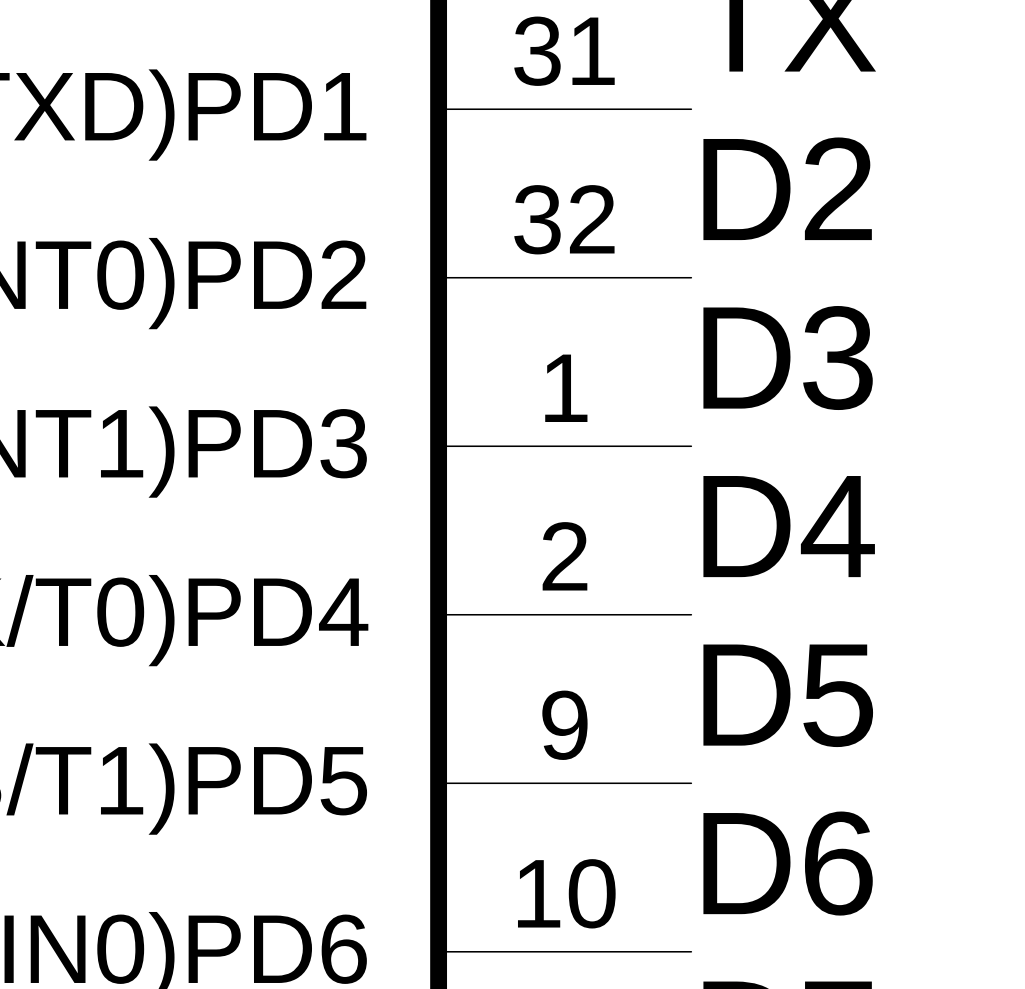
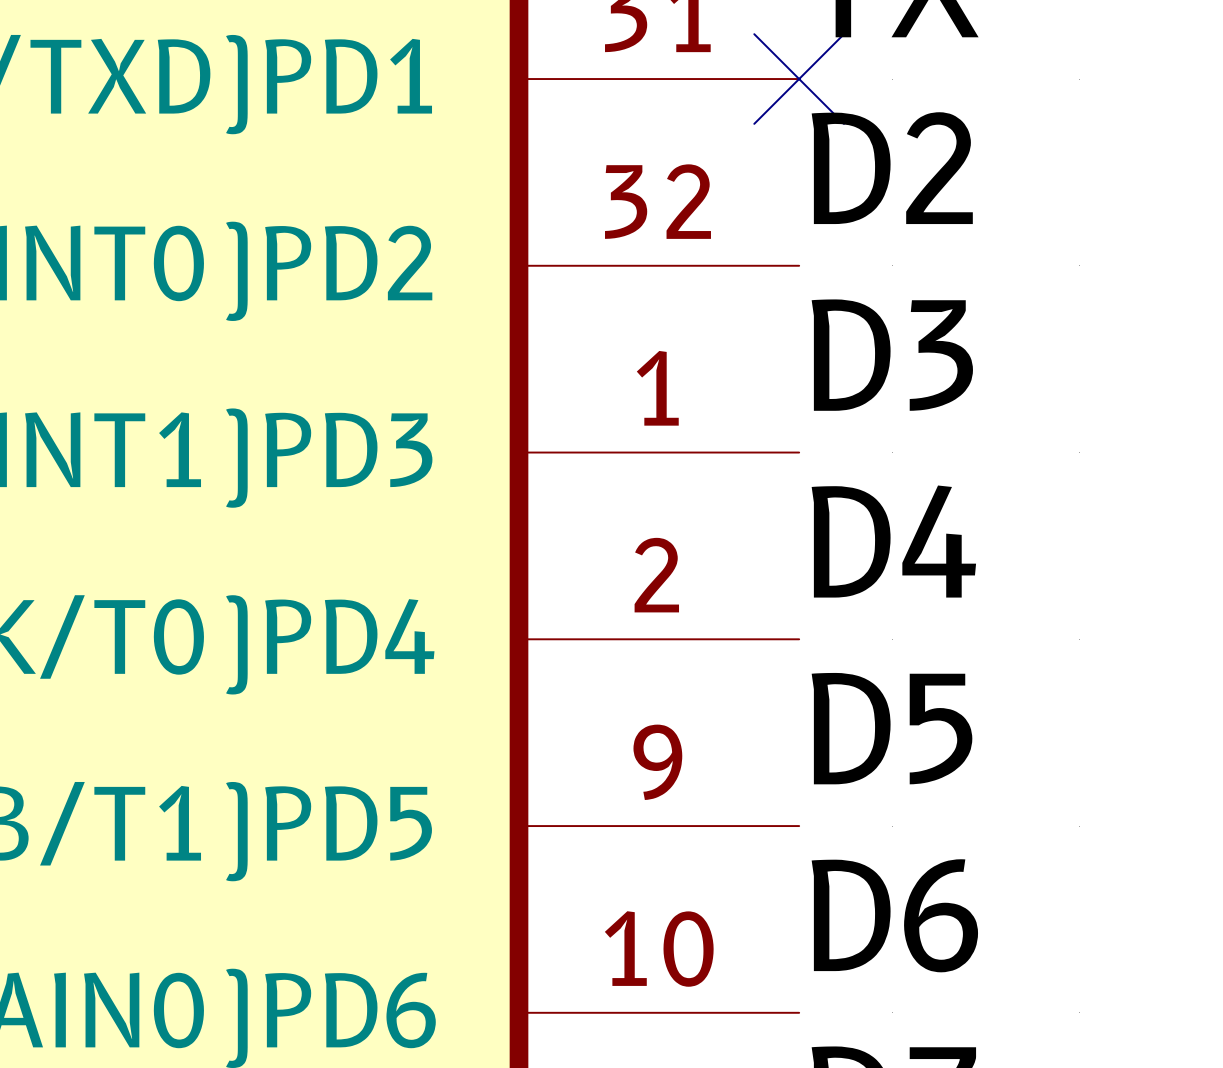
no-connect mark: none -> (799, 79)

